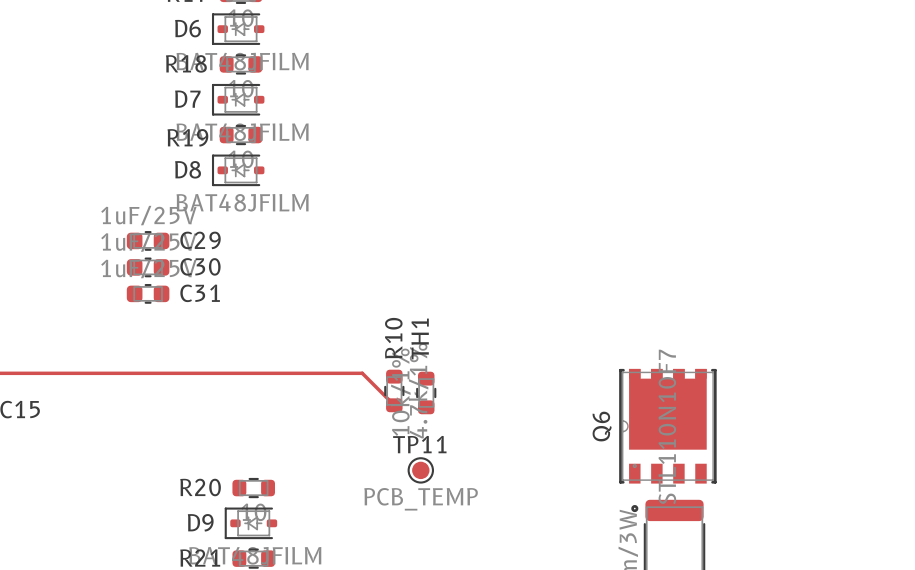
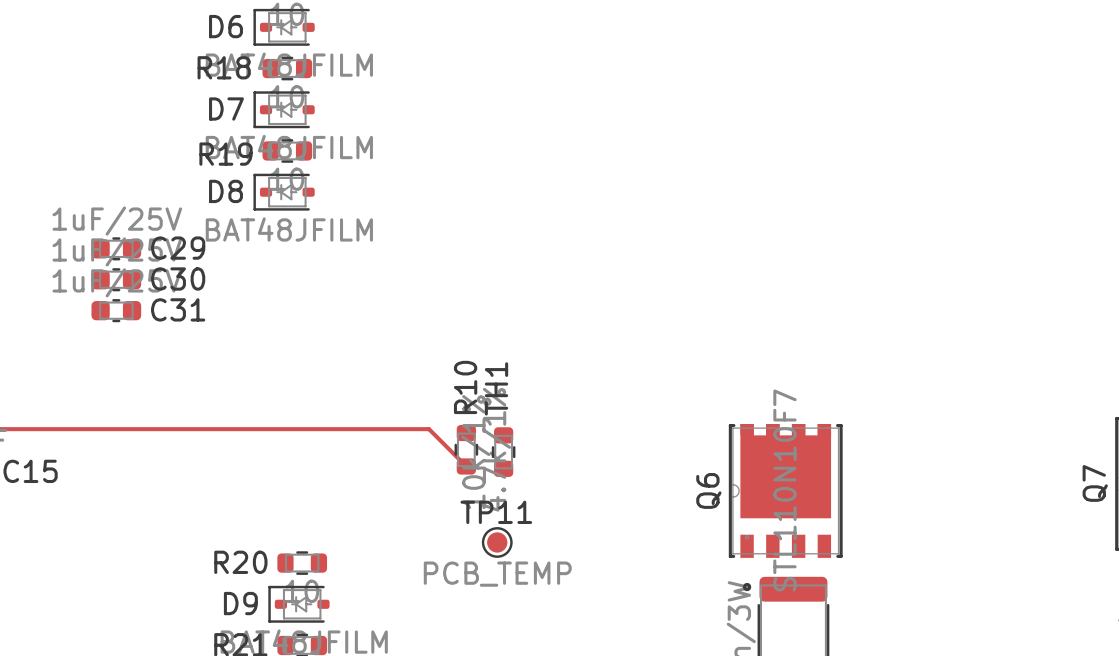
C29 position: (148, 240) -> (116, 248)
C30 position: (148, 267) -> (116, 279)
C31 position: (148, 293) -> (116, 310)

